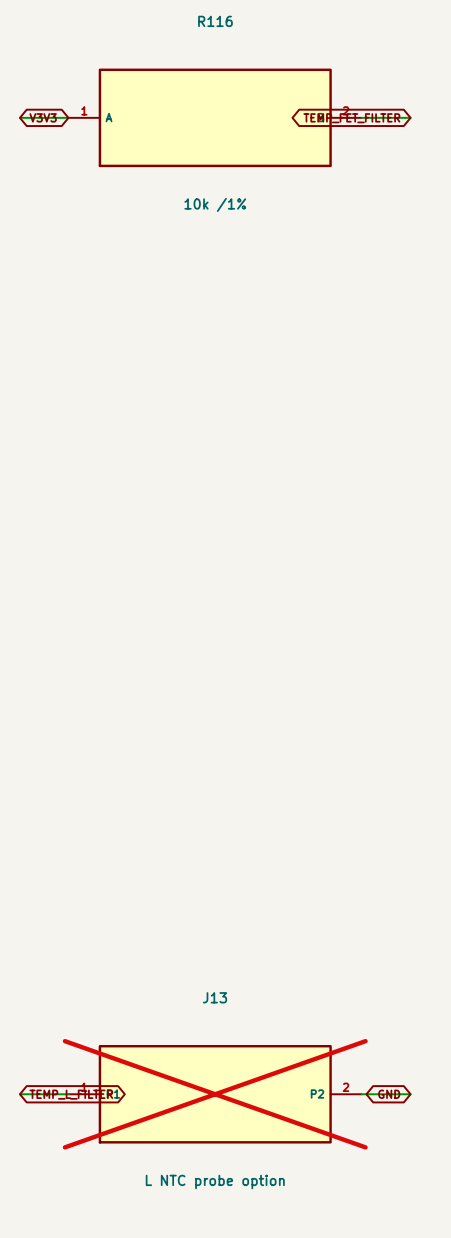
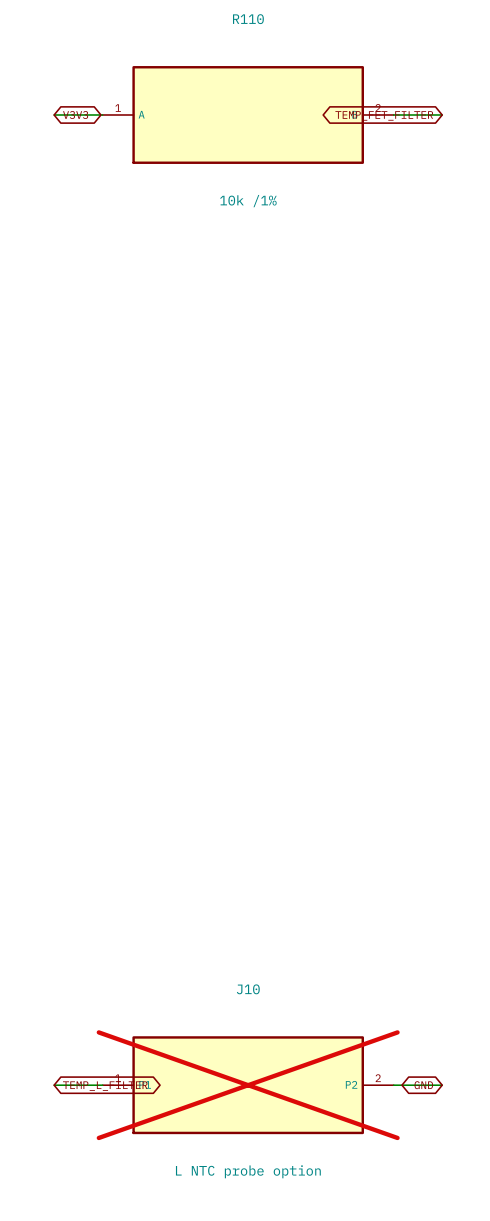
R116 name: R116 (215, 21) -> R110 (248, 19)
J13 name: J13 (215, 997) -> J10 (248, 989)

